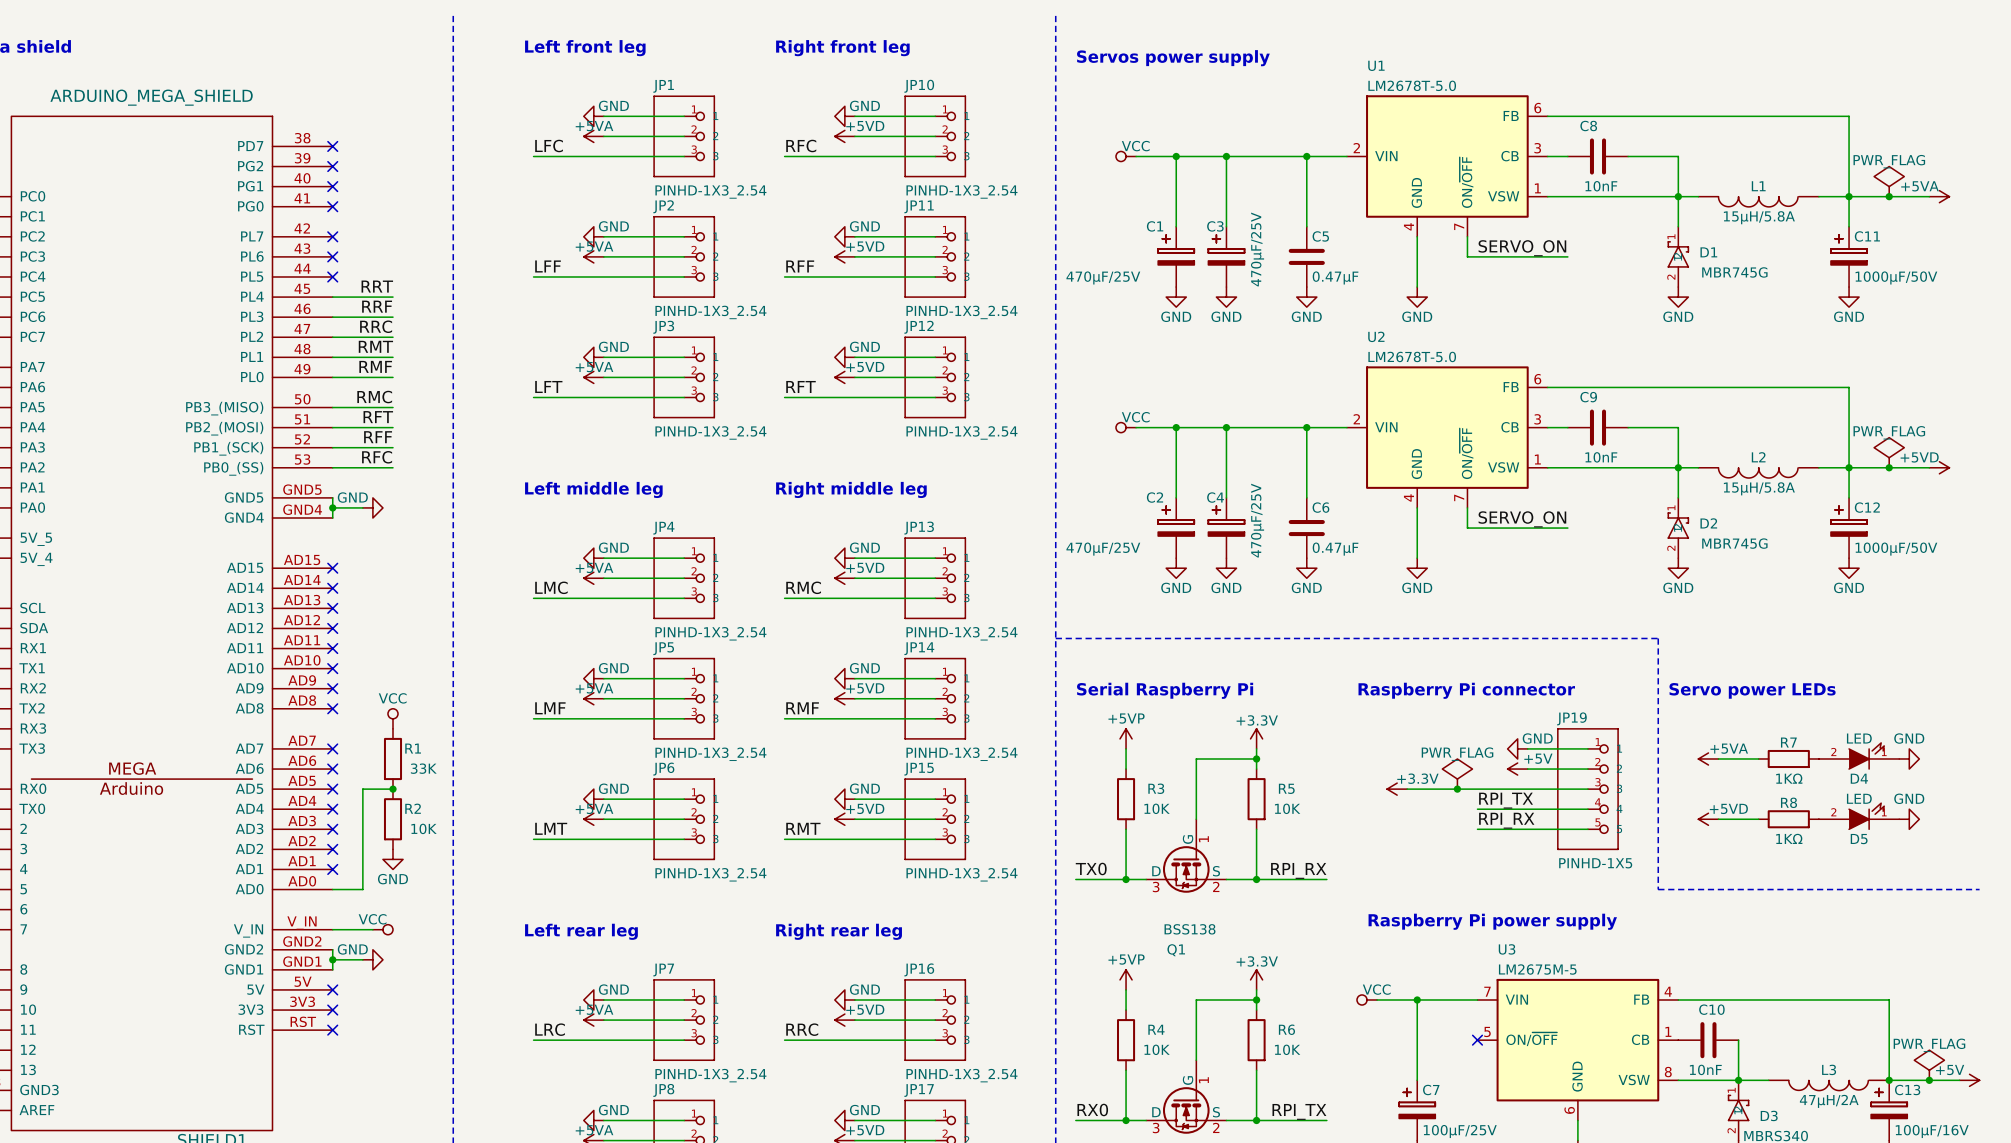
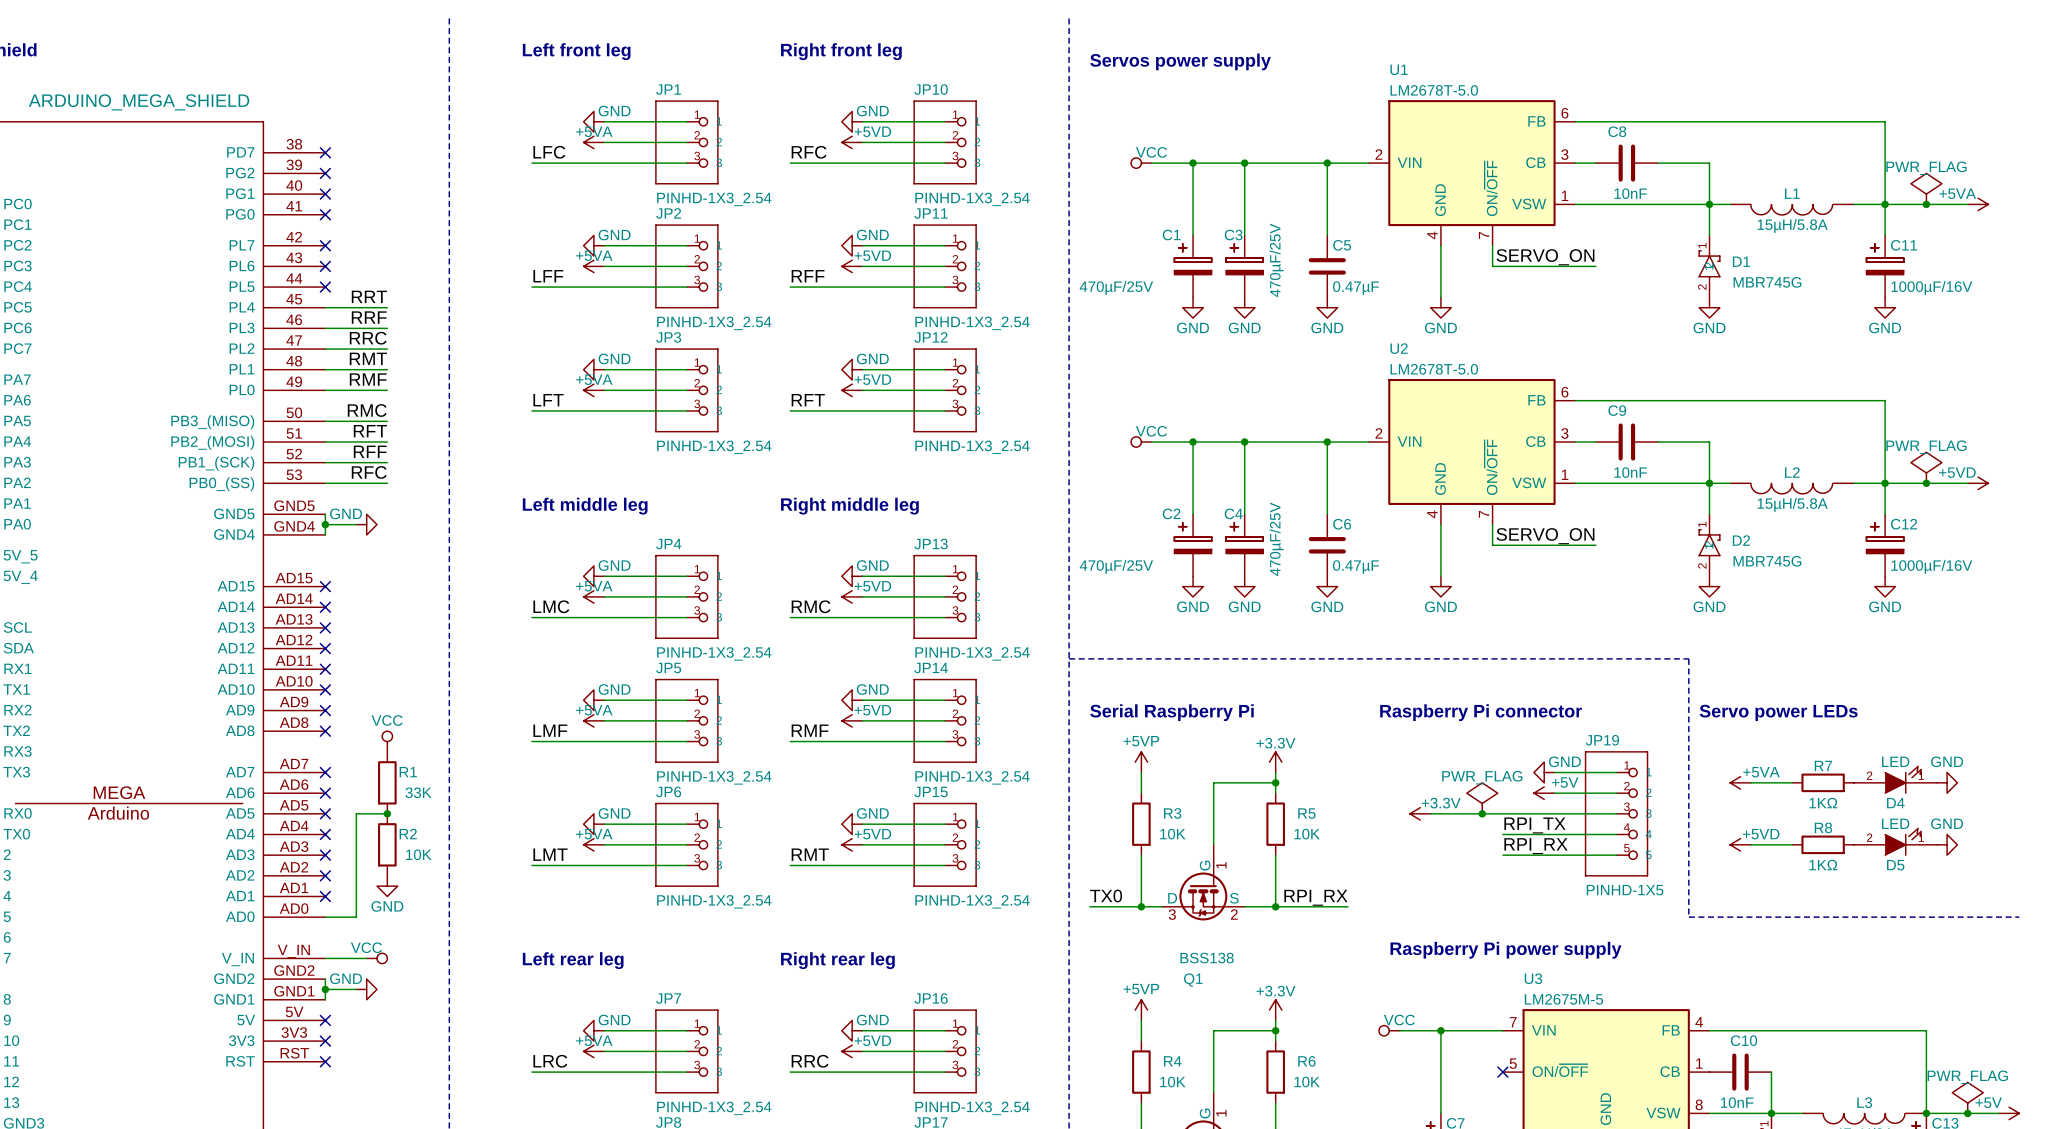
C11 value: 1000µF/50V (1896, 277) -> 1000µF/16V (1931, 287)
C12 value: 1000µF/50V (1896, 549) -> 1000µF/16V (1931, 566)

